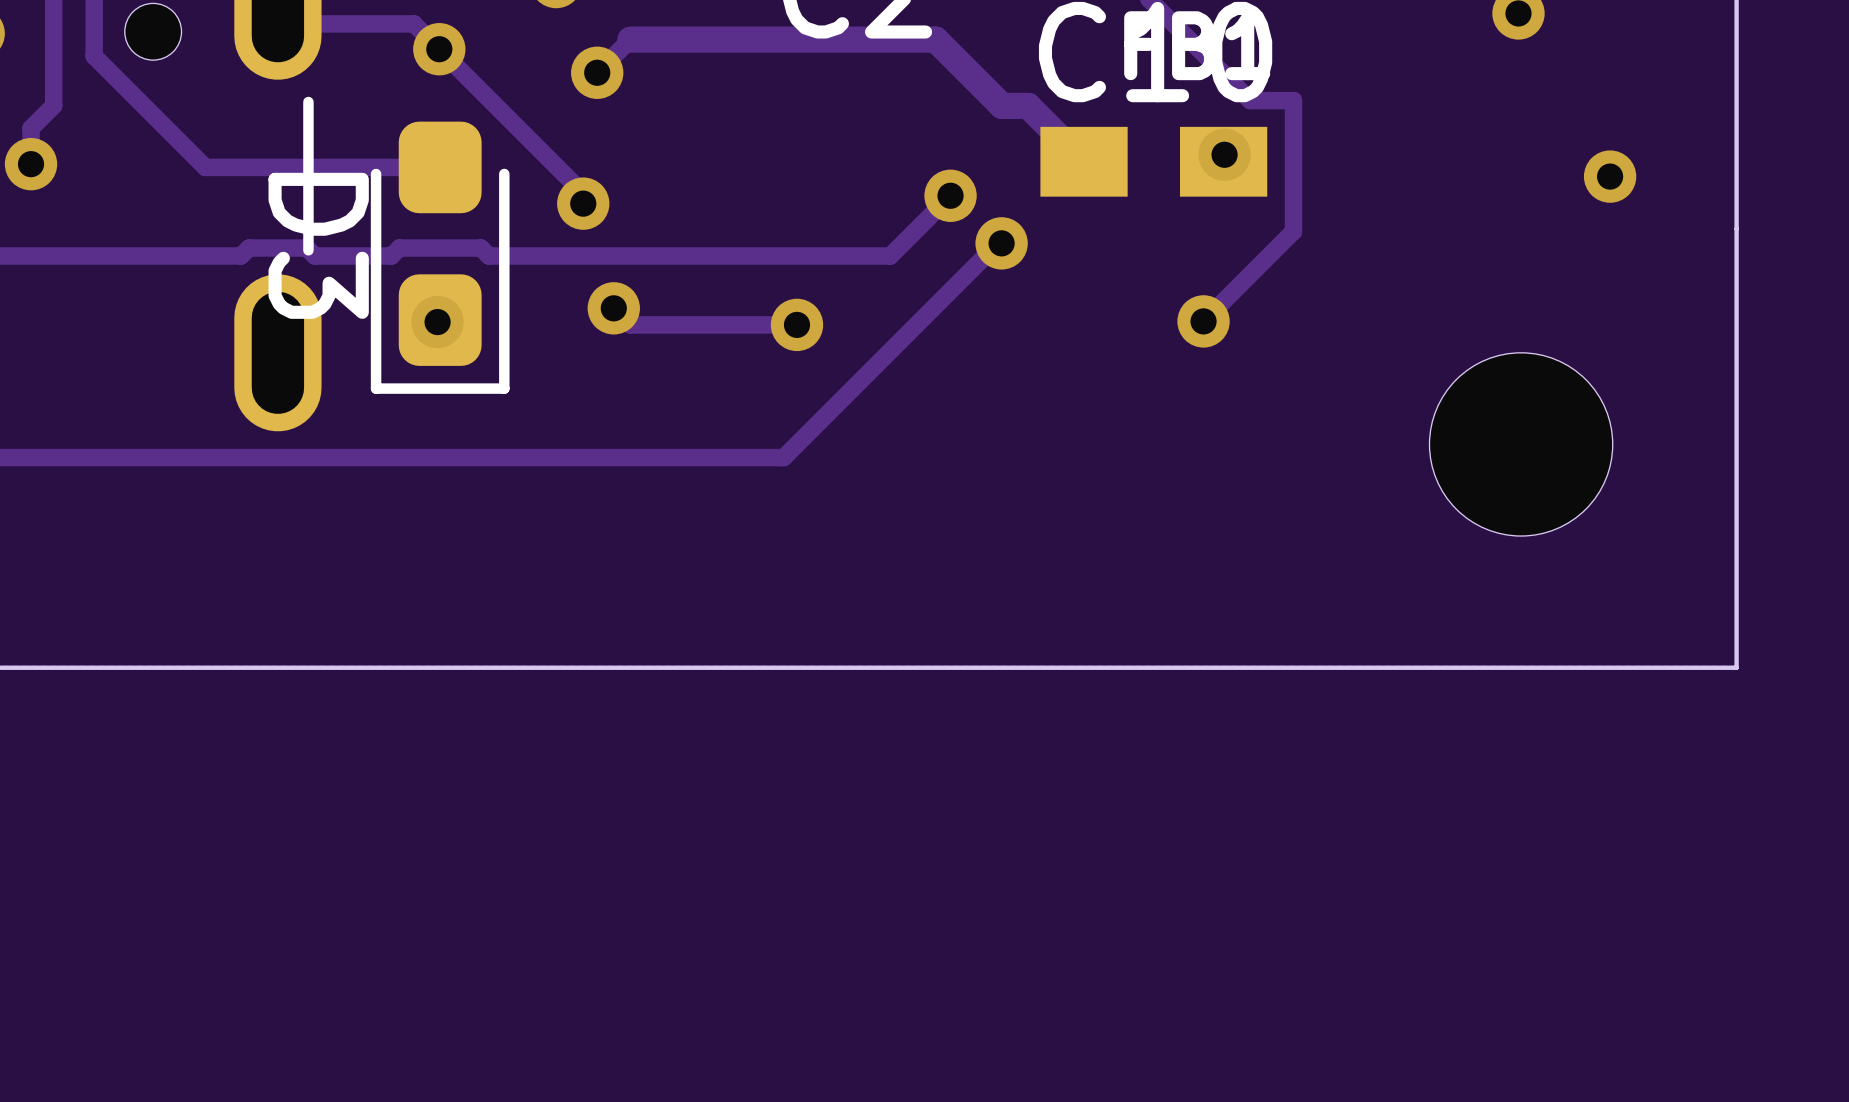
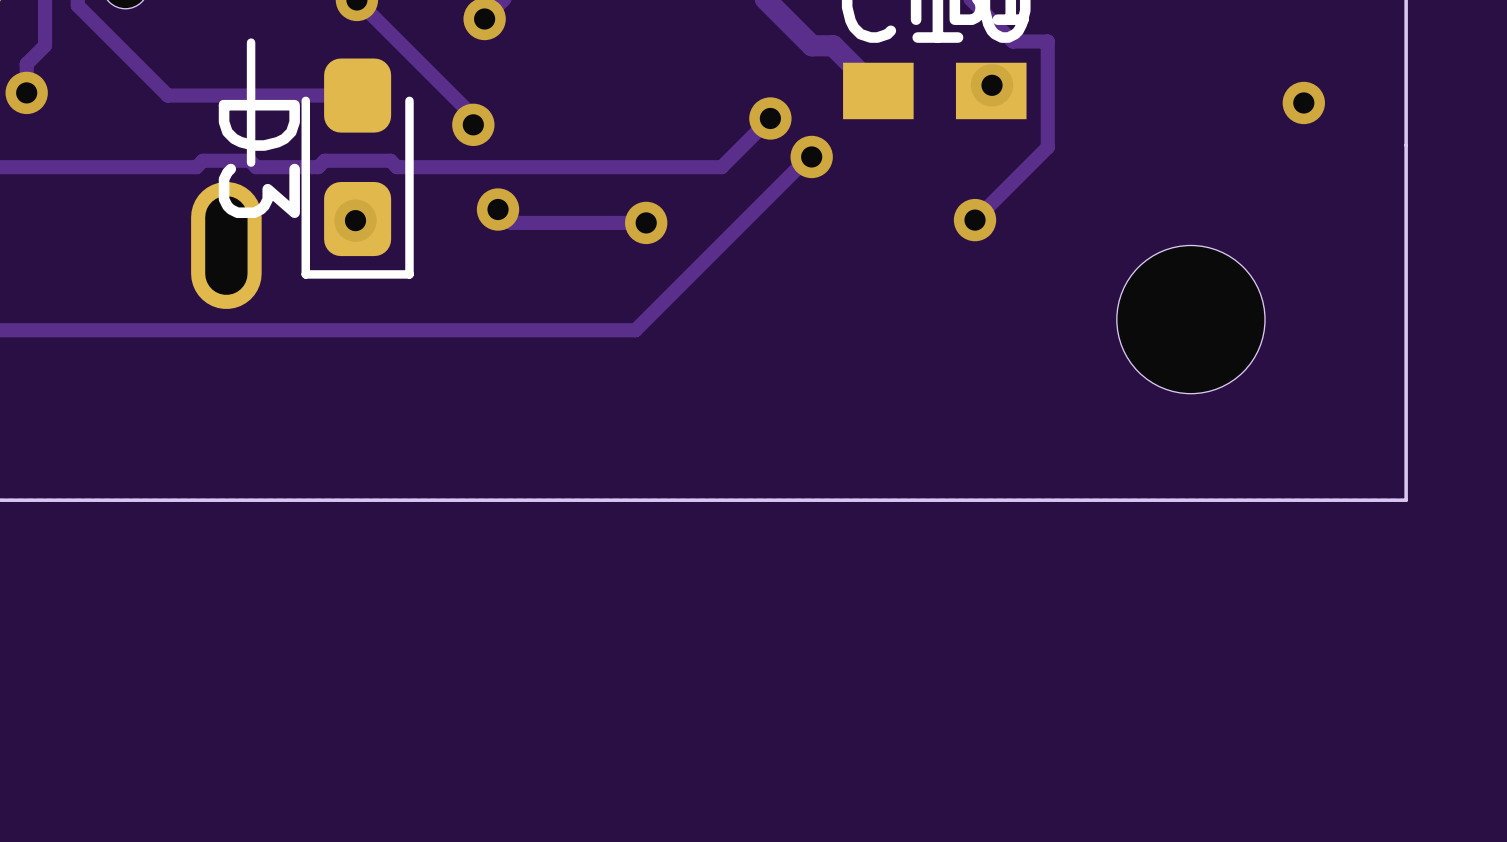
part position: (1521, 444) -> (1190, 319)

